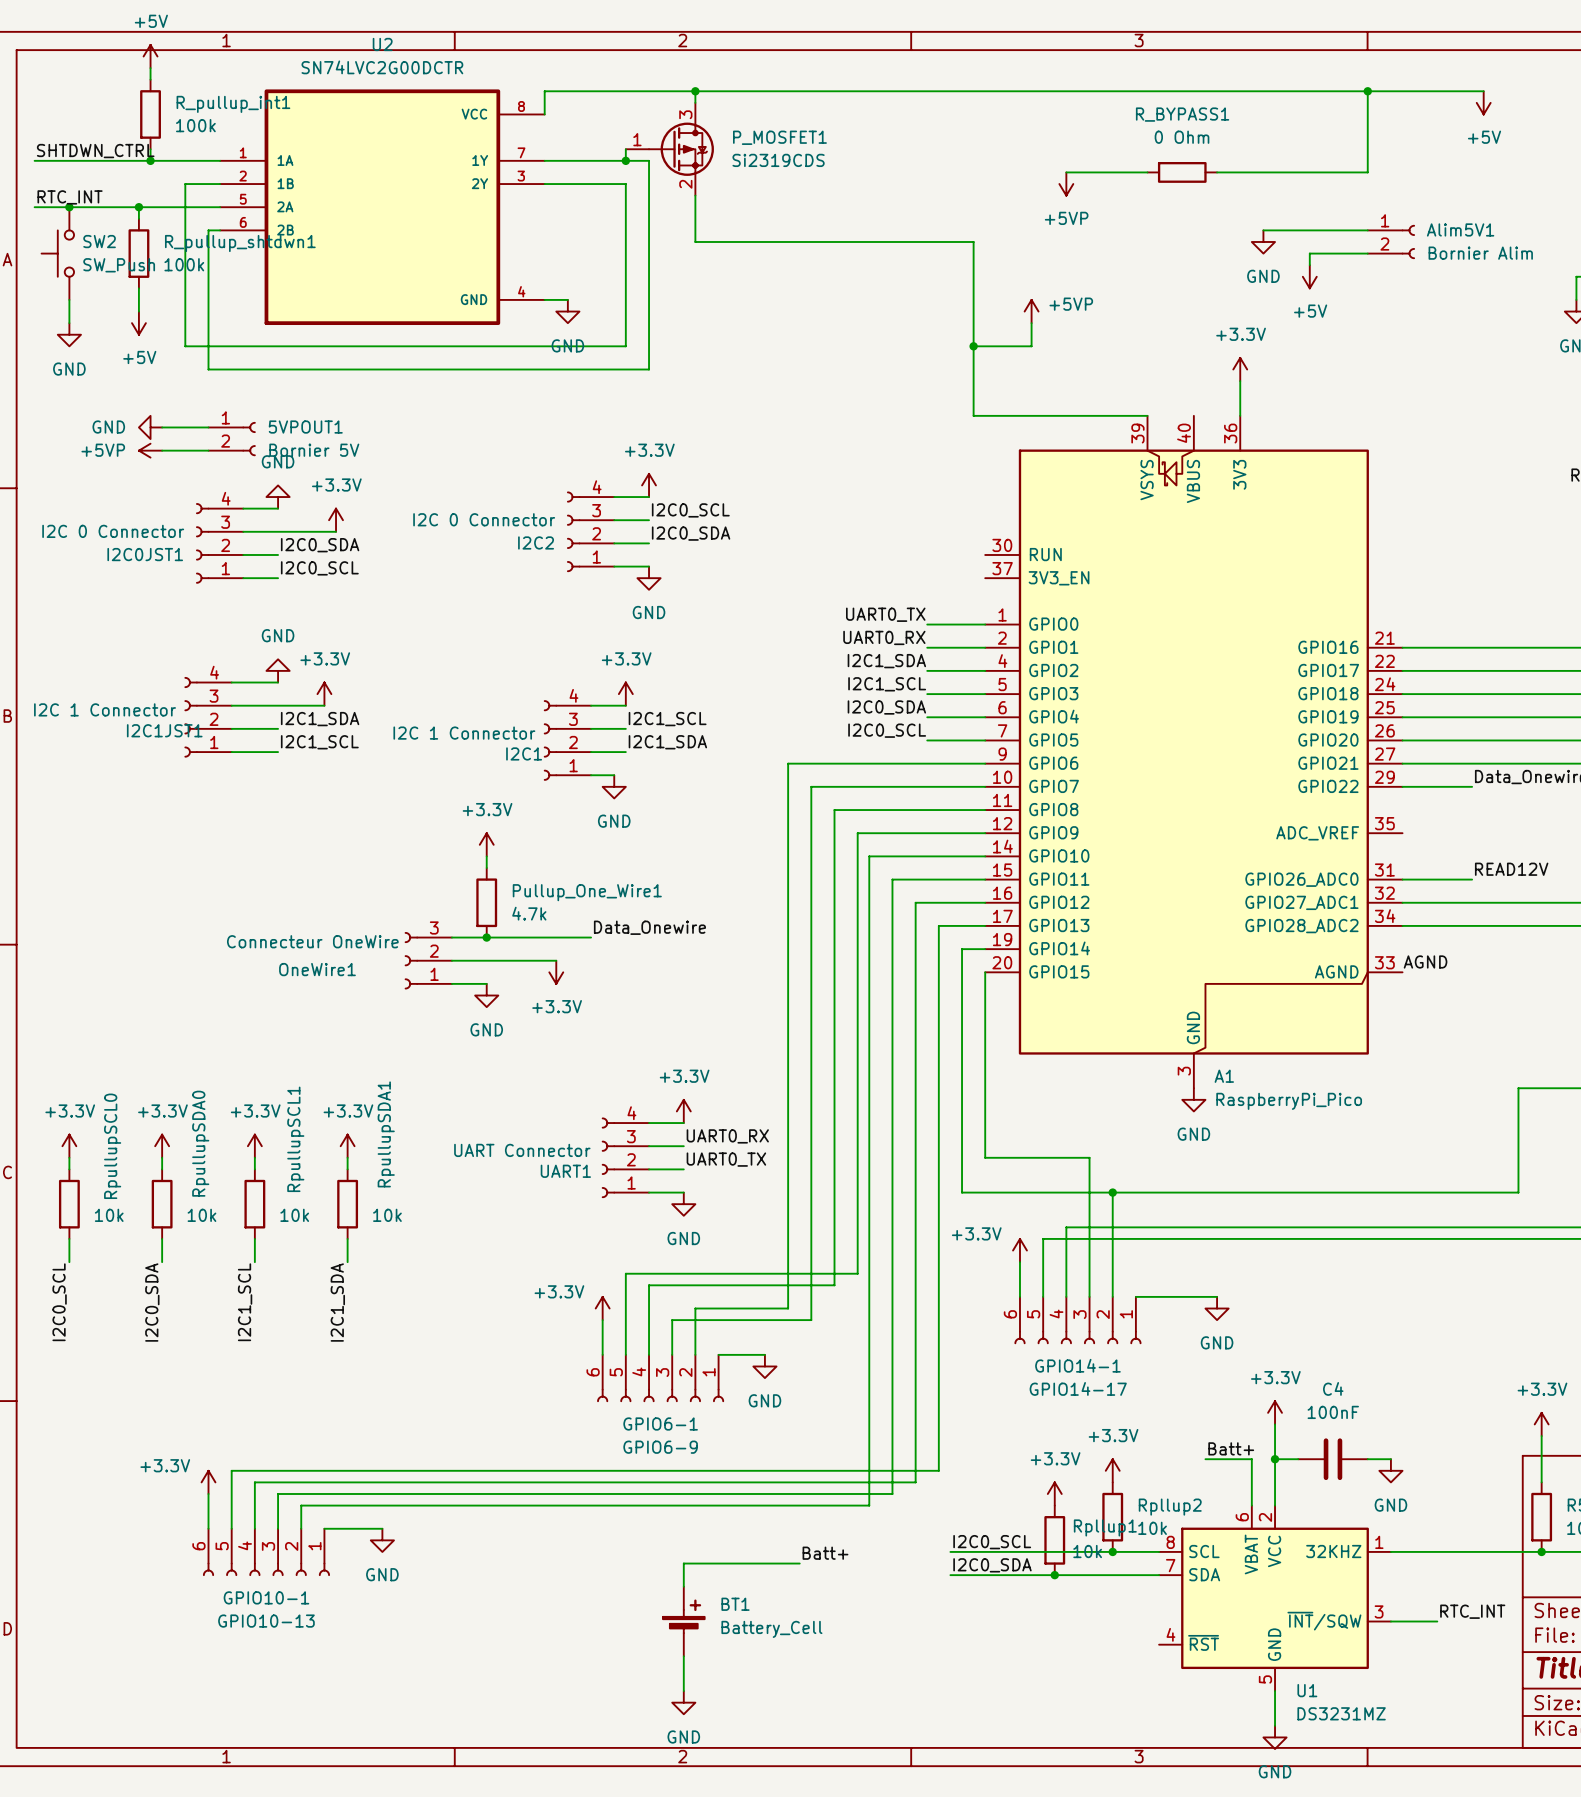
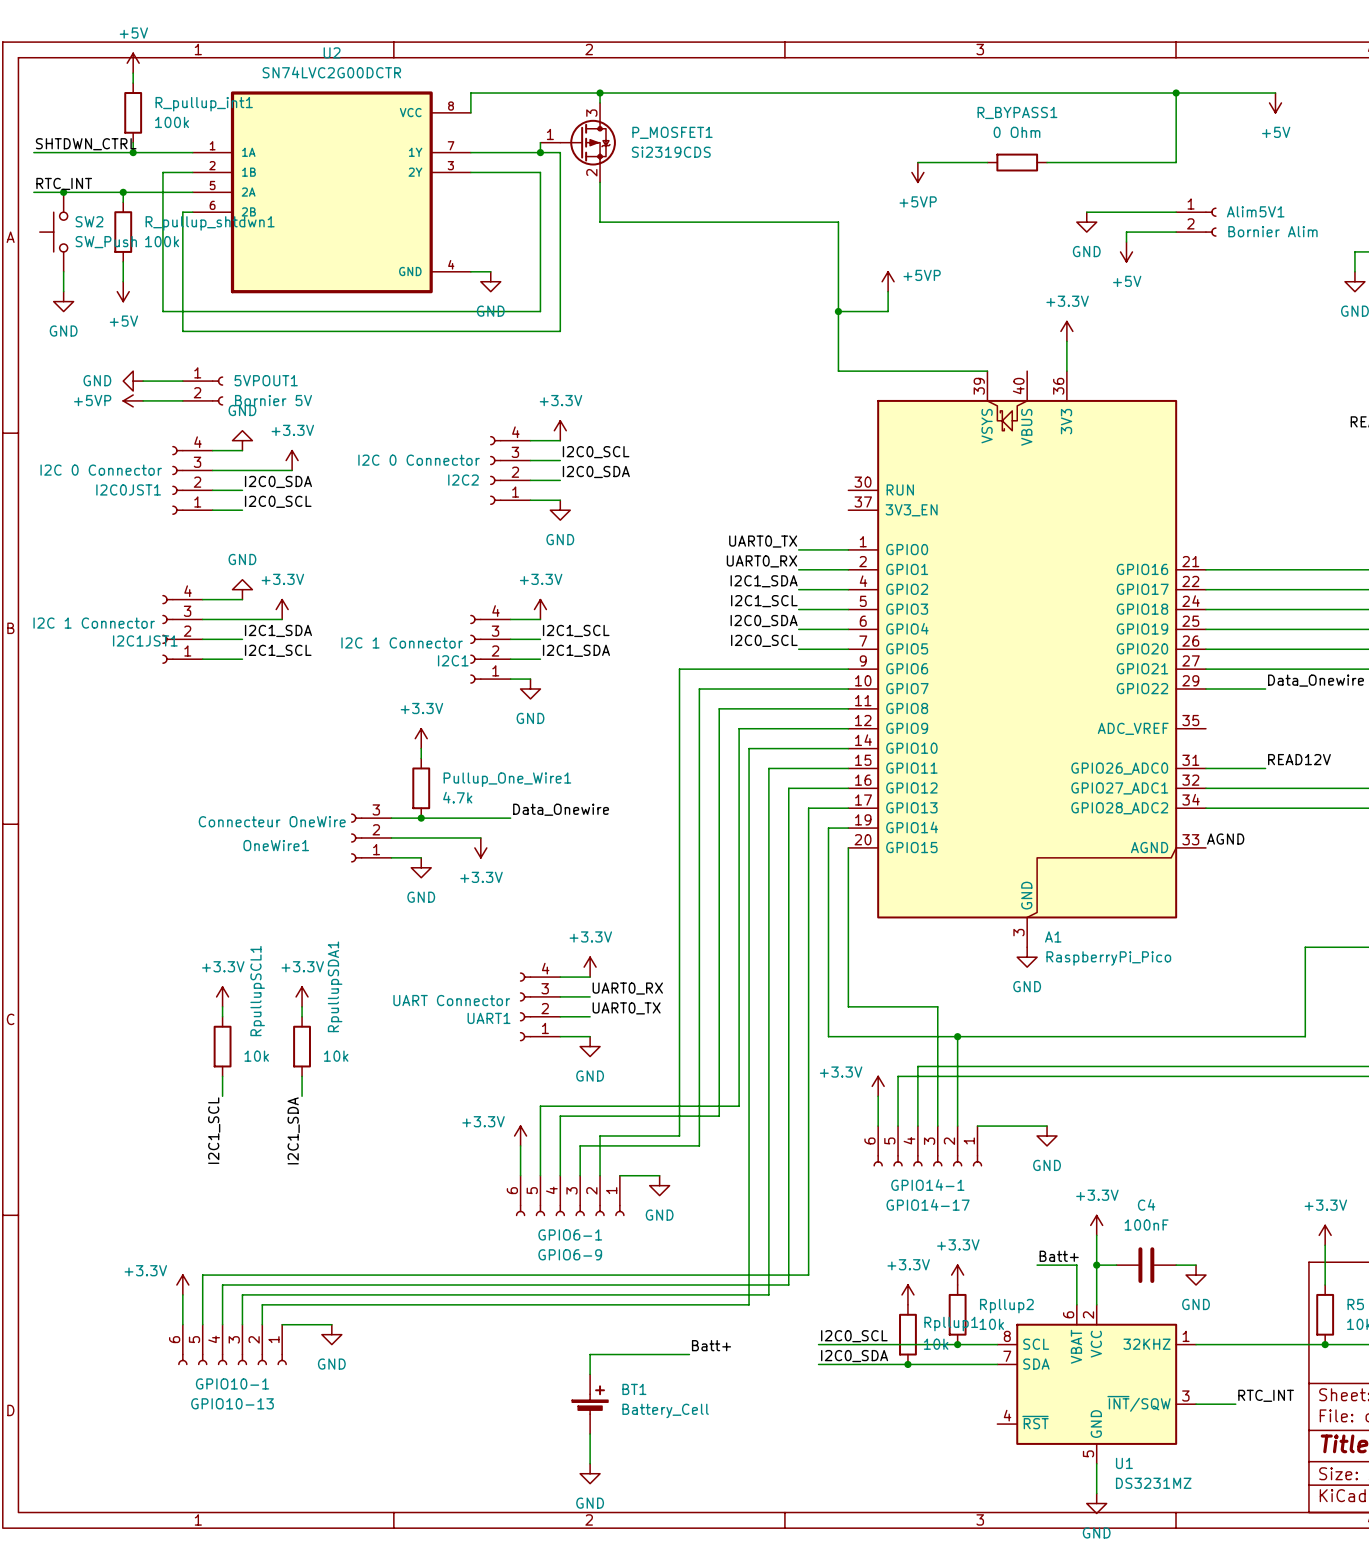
power symbol: +3.3V (69, 1146) -> none
power symbol: +3.3V (162, 1146) -> none
wire: (69, 1157) (69, 1169) -> none
wire: (162, 1157) (162, 1169) -> none
RpullupSCL0: 10k (69, 1204) -> none
RpullupSDA0: 10k (162, 1204) -> none
wire: (69, 1238) (69, 1262) -> none
wire: (162, 1238) (162, 1262) -> none
label: I2C0_SCL (59, 1302) -> none
label: I2C0_SDA (152, 1302) -> none

